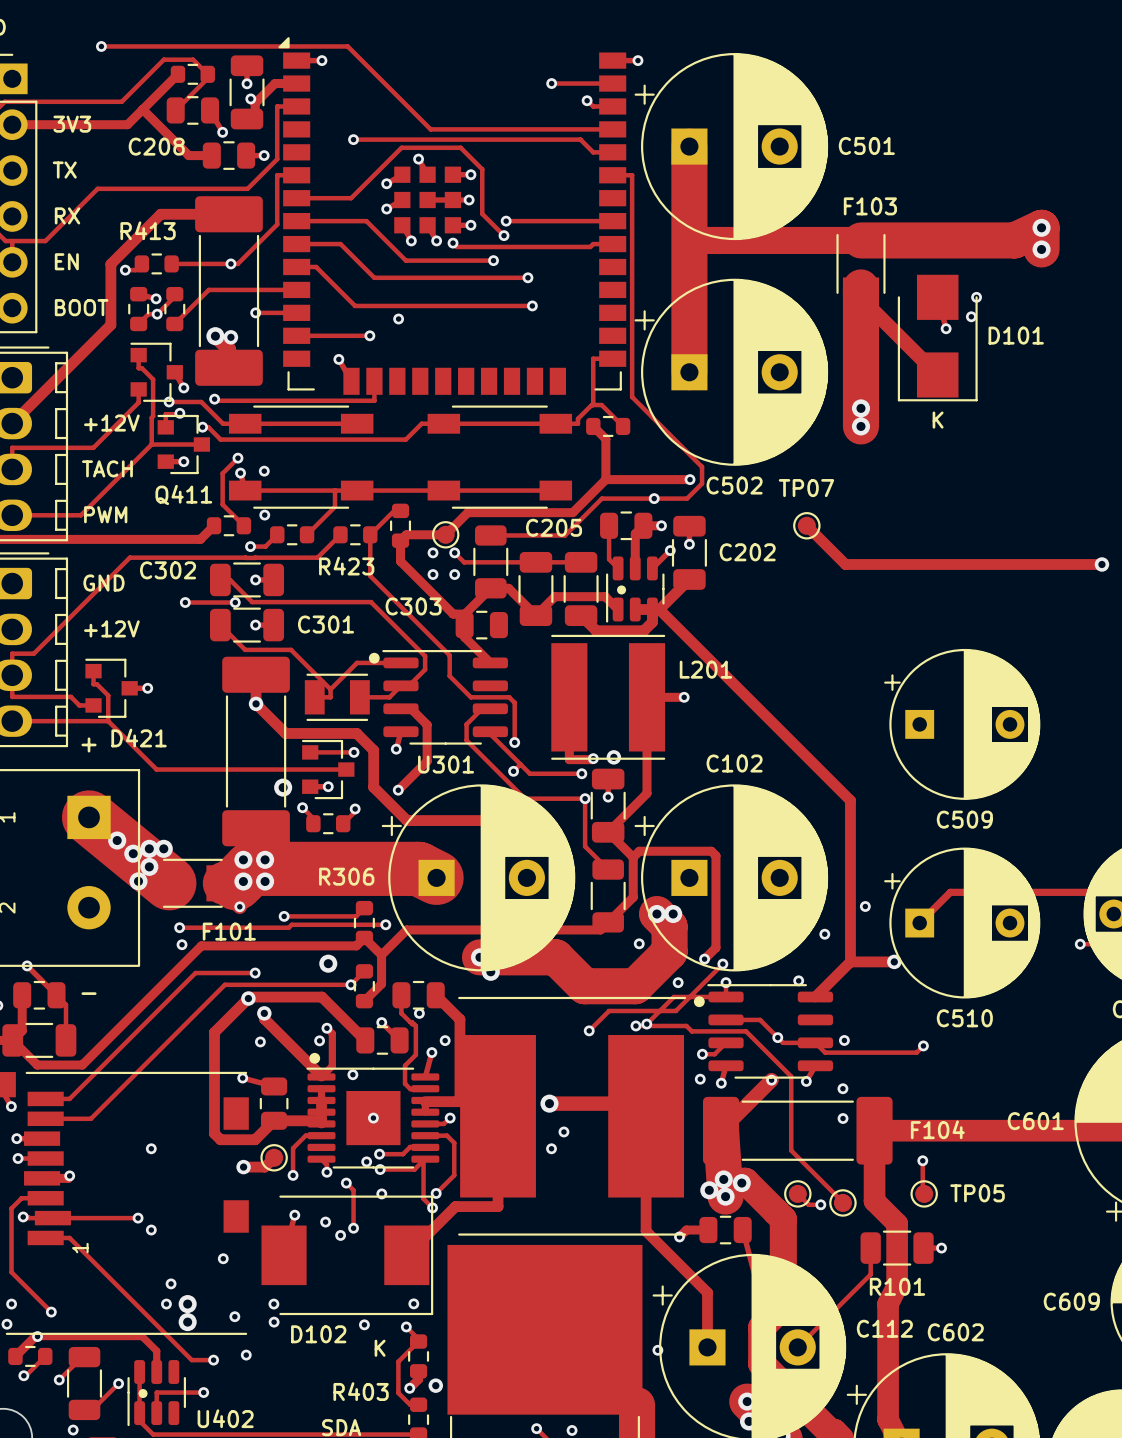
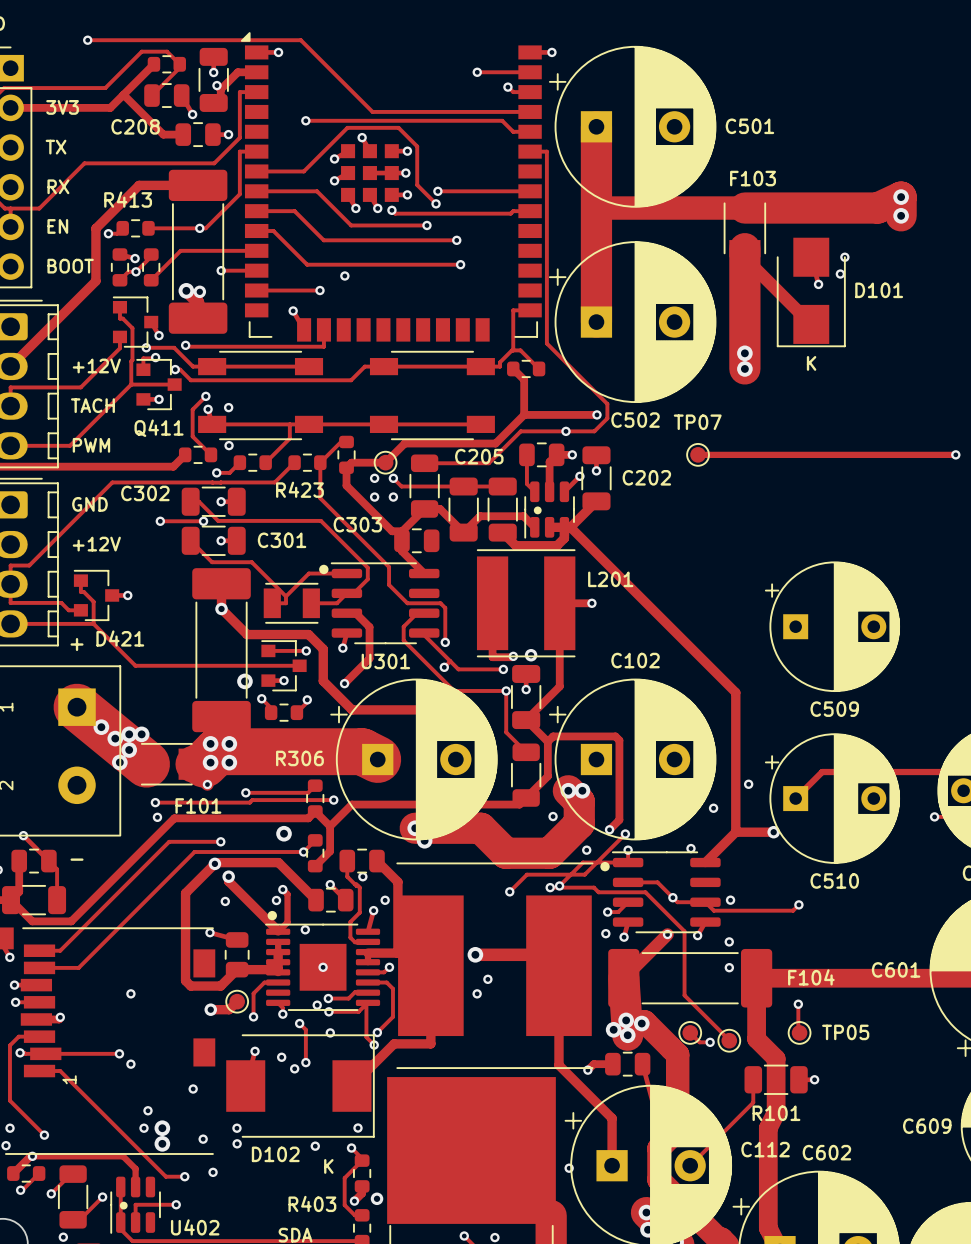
track: (806, 525) (845, 564) (1101, 564) -> (698, 454) (955, 454)
via: none -> (955, 454)
via: (1101, 564) -> none

